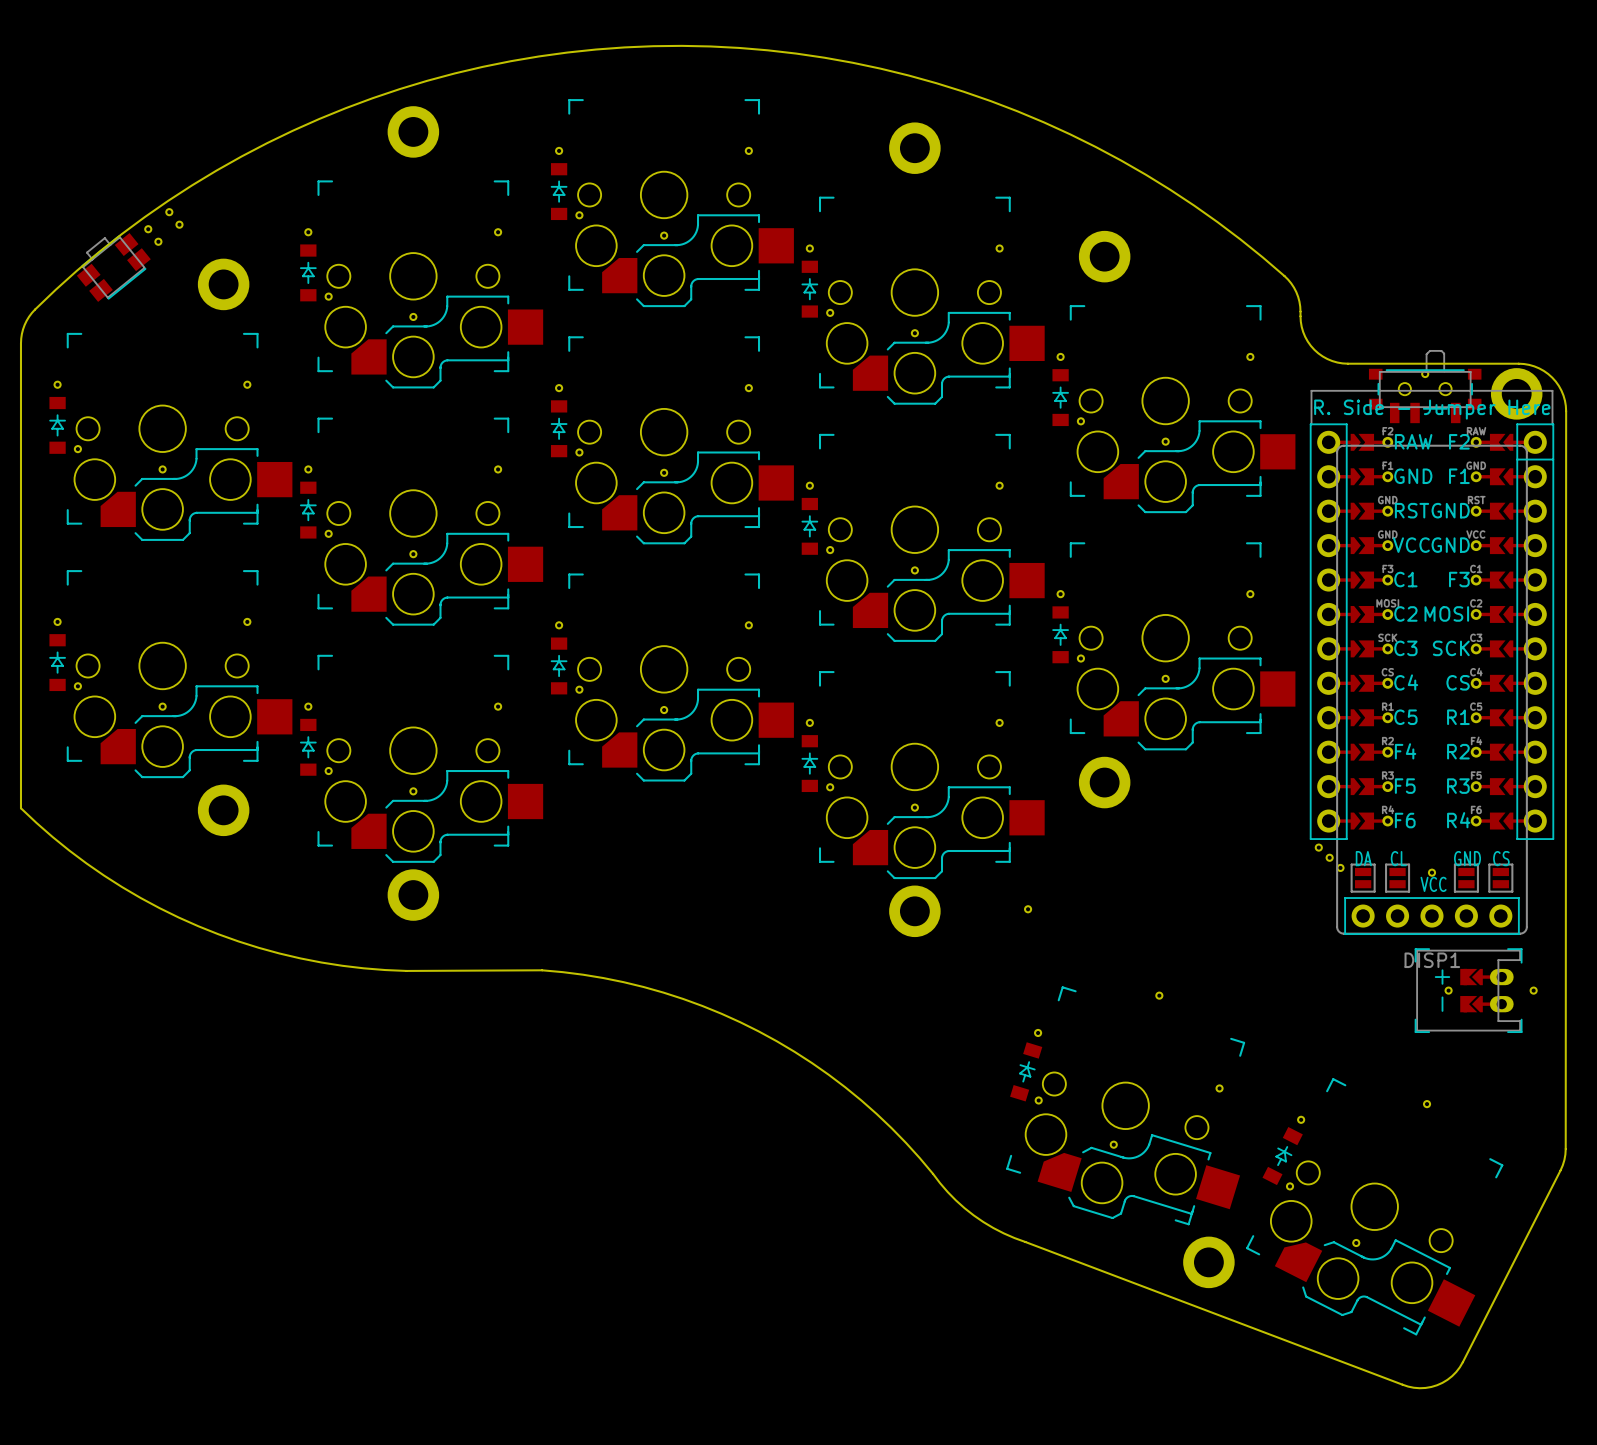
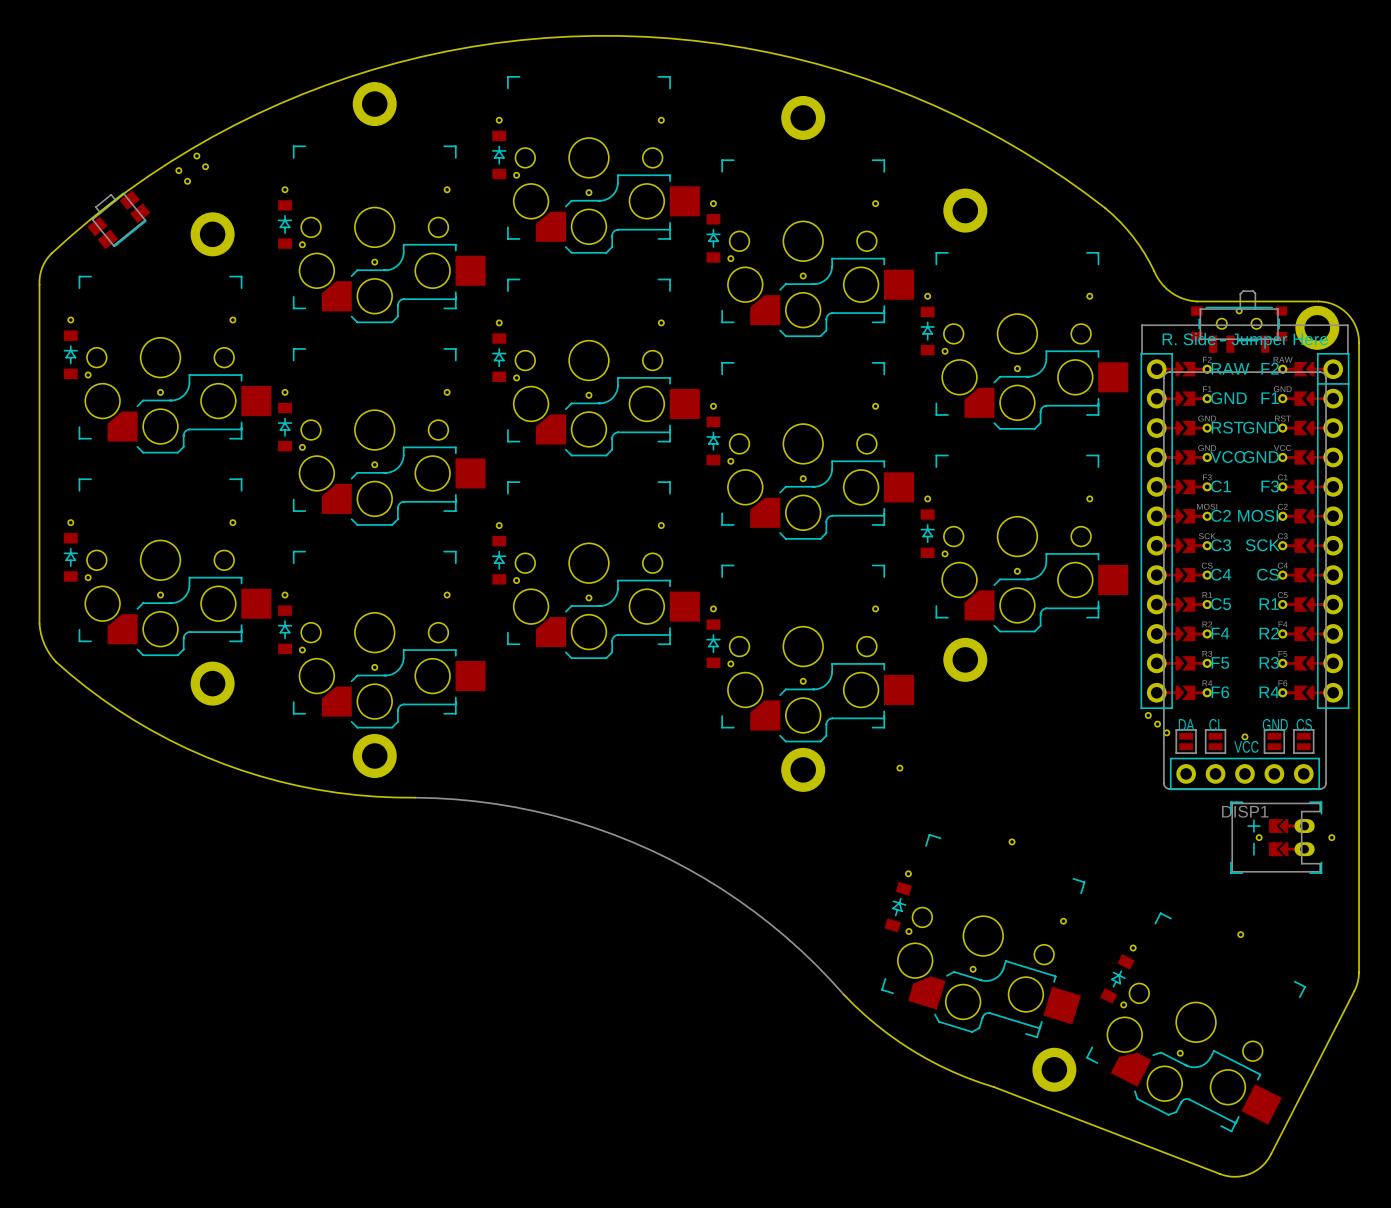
part: none -> (196, 156)
part: none -> (205, 166)
part: none -> (178, 170)
part: (169, 212) -> none
part: none -> (187, 181)
part: (179, 224) -> none
part: (148, 229) -> none
part: (158, 241) -> none
board edge: (20, 343) (24, 324) (35, 309) (77, 270) (121, 234) (192, 185) (241, 156) (292, 130) (372, 98) (427, 80) (482, 66) (539, 56) (596, 49) (681, 45) (739, 47) (796, 53) (880, 68) (963, 91) (1017, 111) (1070, 134) (1121, 160) (1170, 189) (1217, 222) (1284, 276) (1291, 283) (1298, 296) (1301, 326) (1307, 341) (1318, 353) (1332, 361) (1347, 363) (1518, 363) (1539, 368) (1548, 374) (1558, 385) (1563, 395) (1566, 411) (1564, 1160) (1459, 1367) (1452, 1376) (1437, 1385) (1425, 1387) (1408, 1386) (1014, 1238) (993, 1228) (955, 1200) (891, 1128) (845, 1087) (811, 1063) (776, 1041) (740, 1022) (702, 1006) (663, 992) (623, 982) (562, 972) (542, 970) (406, 970) (363, 968) (321, 962) (279, 953) (238, 941) (178, 917) (140, 897) (86, 863) (52, 837) (20, 808) (20, 740) -> (415, 797) (356, 795) (298, 785) (241, 770) (186, 748) (118, 710) (71, 675) (49, 653) (42, 639) (39, 623)
board edge: none -> (39, 284) (40, 271) (48, 256) (108, 205) (149, 175) (191, 149) (235, 124) (280, 103) (350, 76) (397, 62) (446, 51) (495, 43) (545, 38) (620, 35) (669, 38) (744, 47) (817, 64) (888, 86) (934, 105) (979, 127) (1044, 164) (1085, 193) (1105, 208) (1126, 229) (1144, 253) (1159, 280) (1175, 295) (1196, 301) (1323, 301) (1336, 305) (1343, 310) (1355, 324) (1359, 342) (1358, 977) (1354, 991) (1268, 1158) (1258, 1169) (1249, 1174) (1239, 1176) (1224, 1175) (966, 1077) (938, 1065) (900, 1042) (876, 1024) (843, 994)
line: none -> (415, 797) (475, 801) (535, 811) (594, 827) (650, 850) (704, 878) (754, 912) (801, 950) (843, 994)

